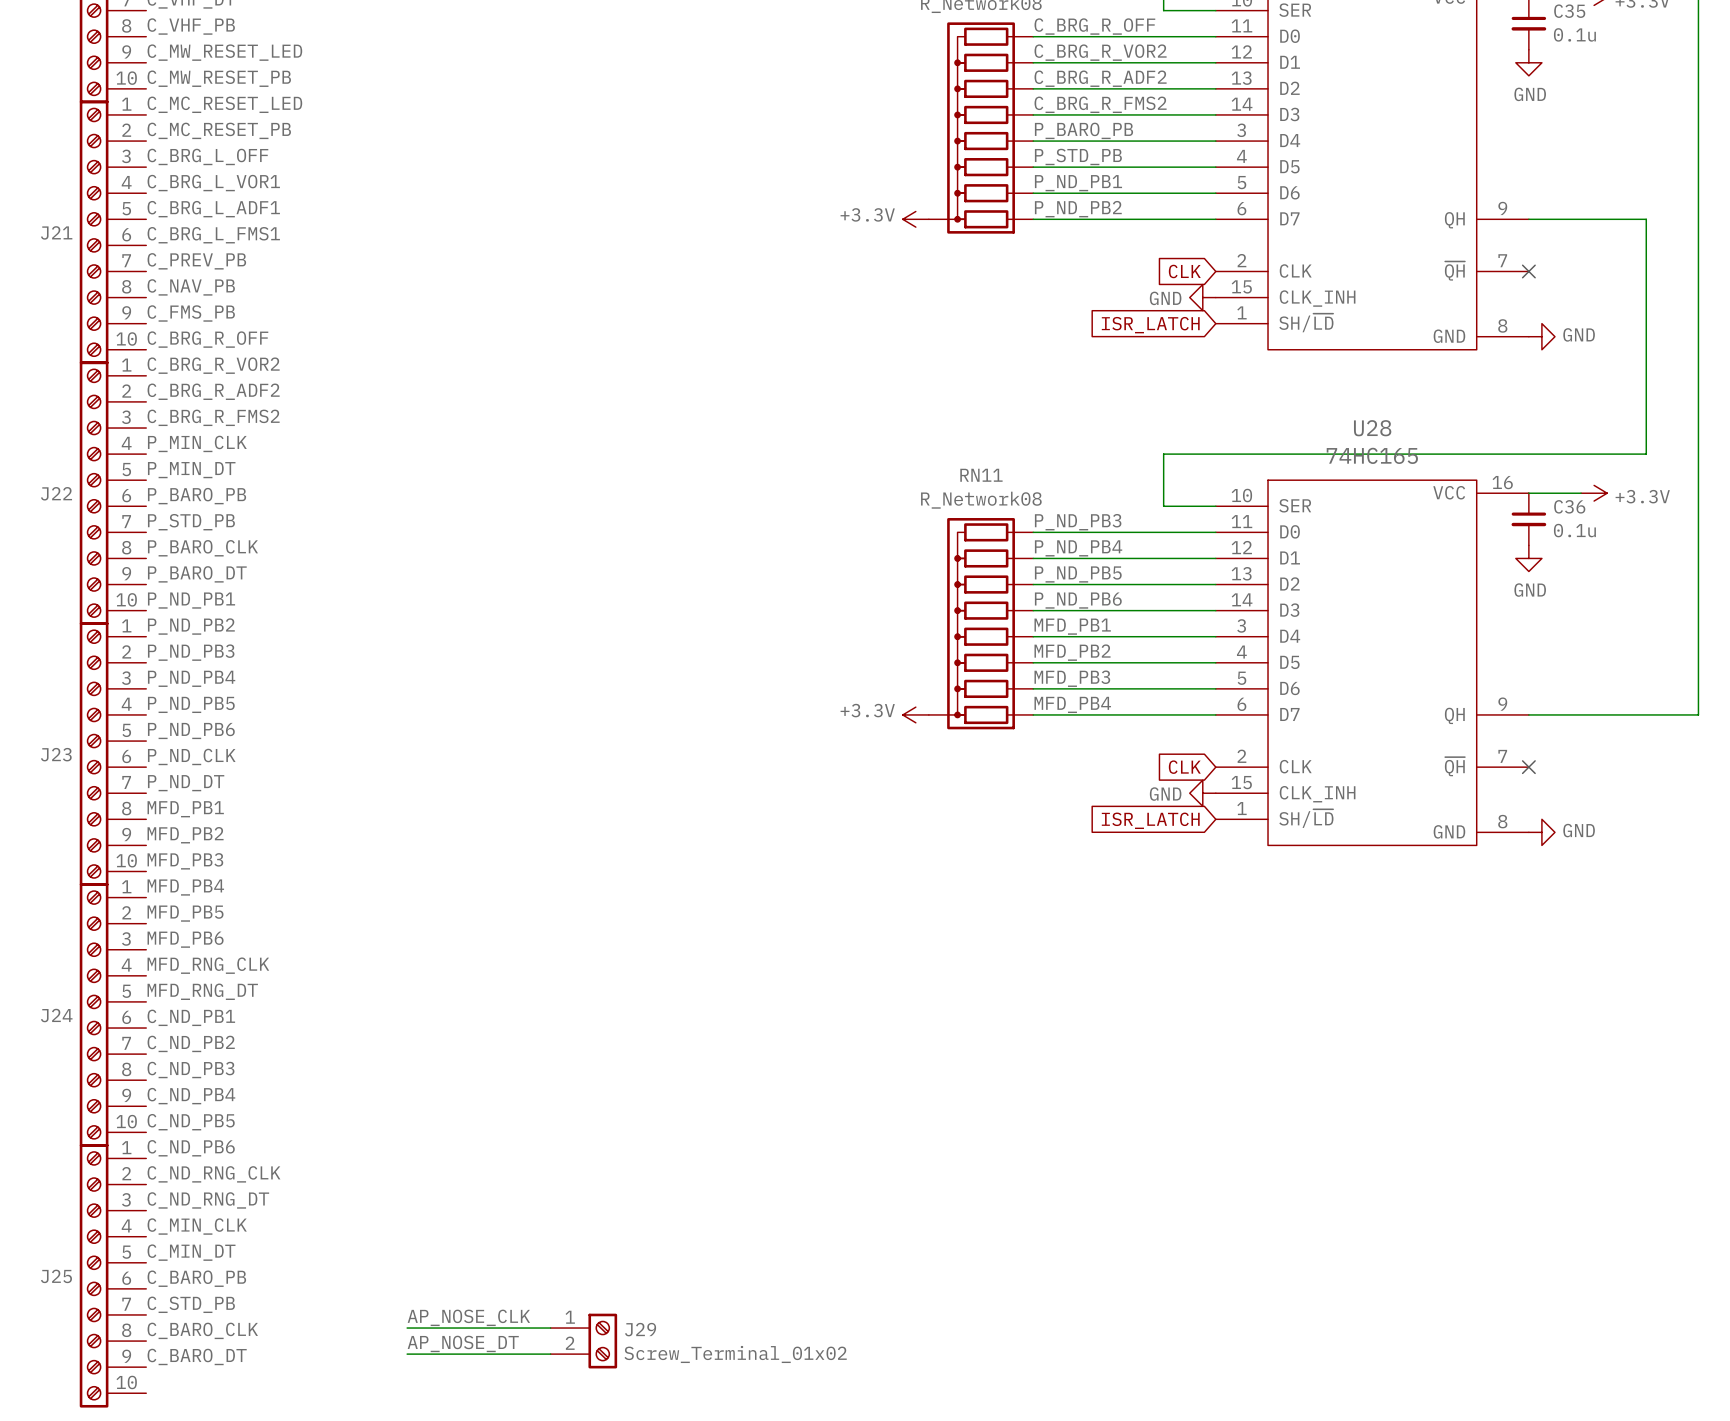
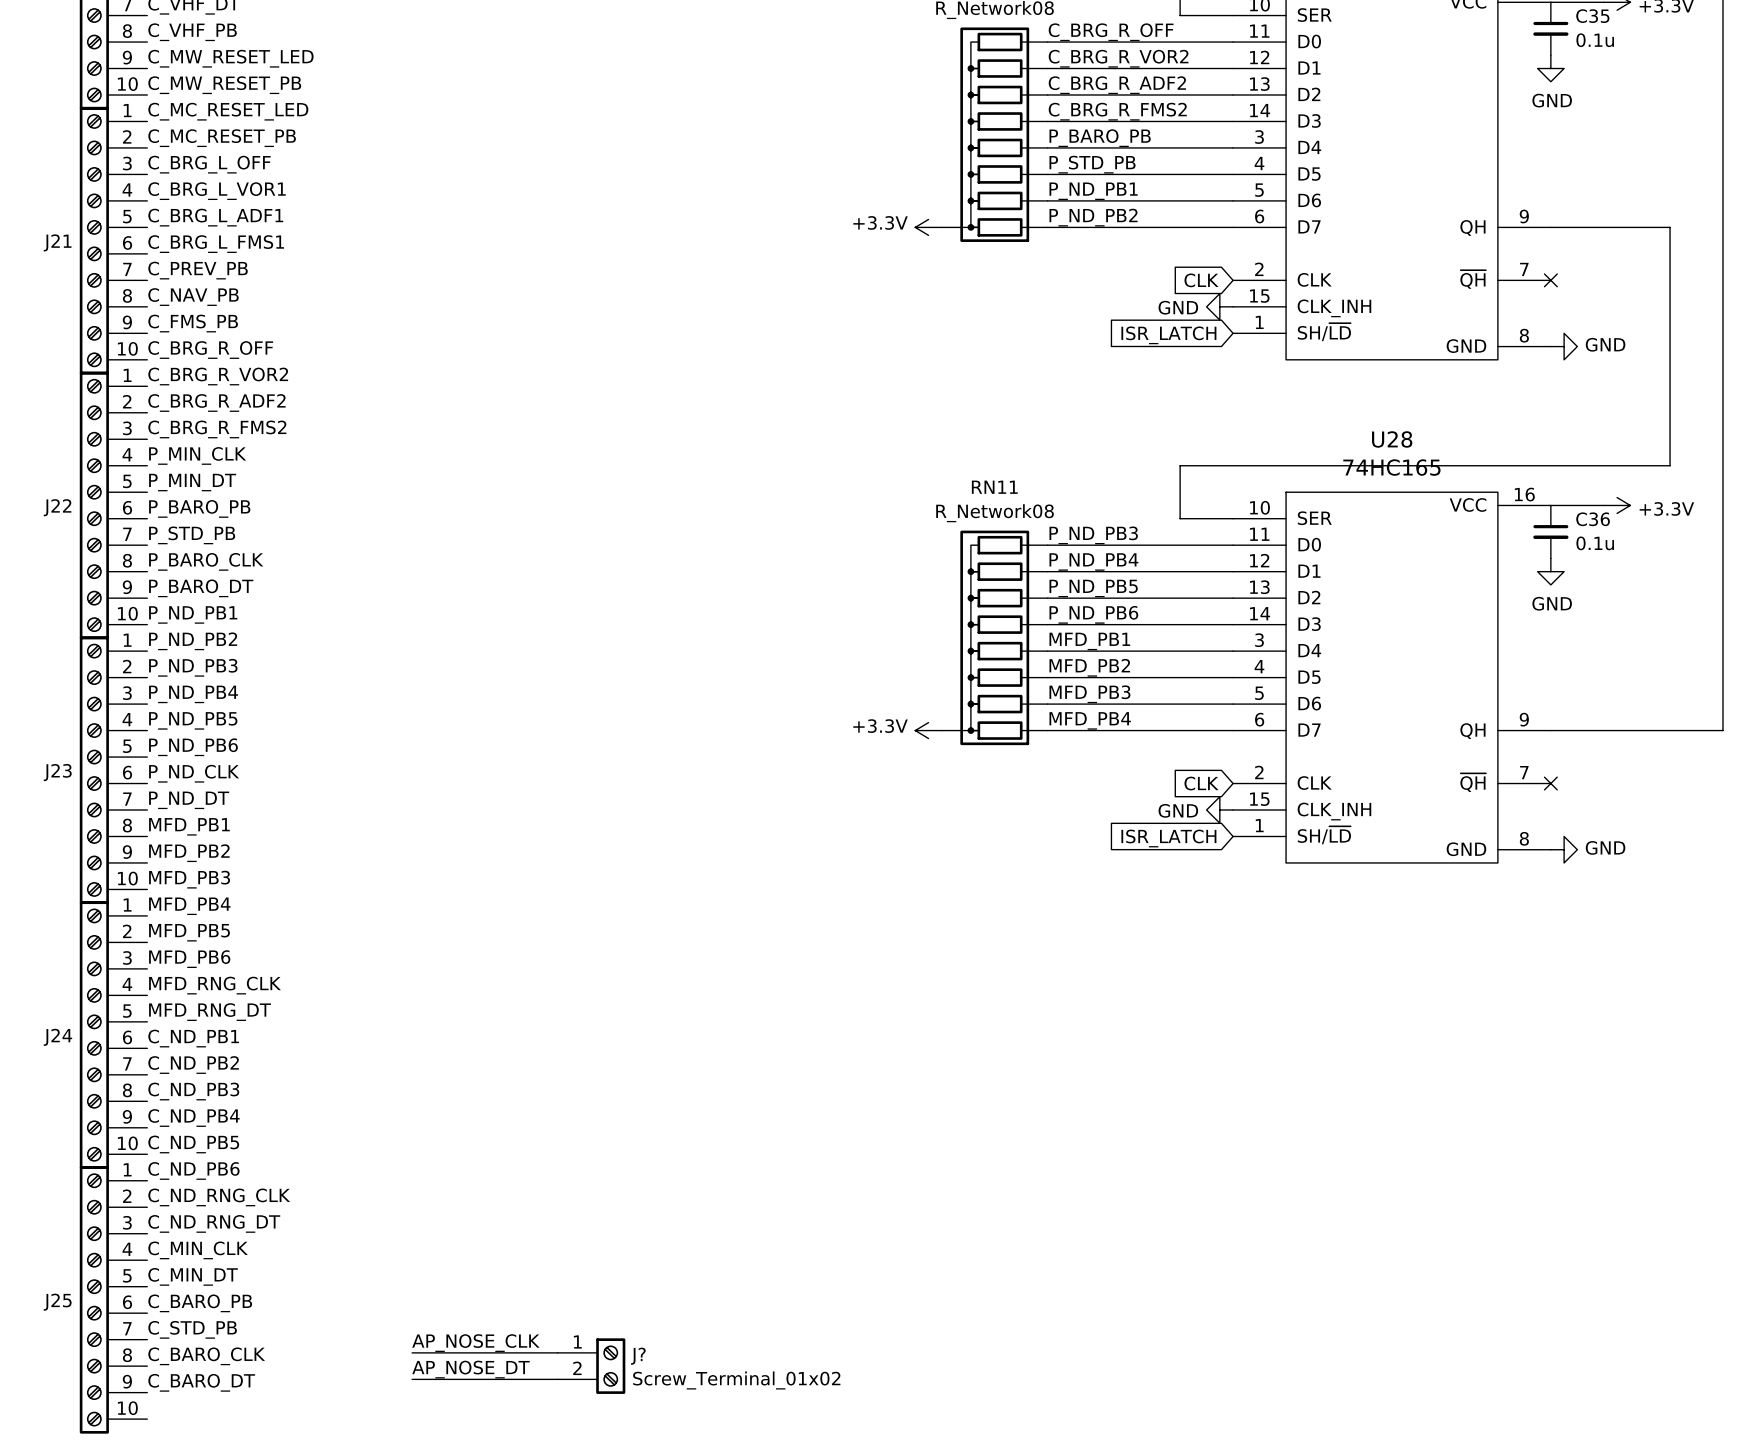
J29 name: J29 (640, 1329) -> J? (638, 1356)

